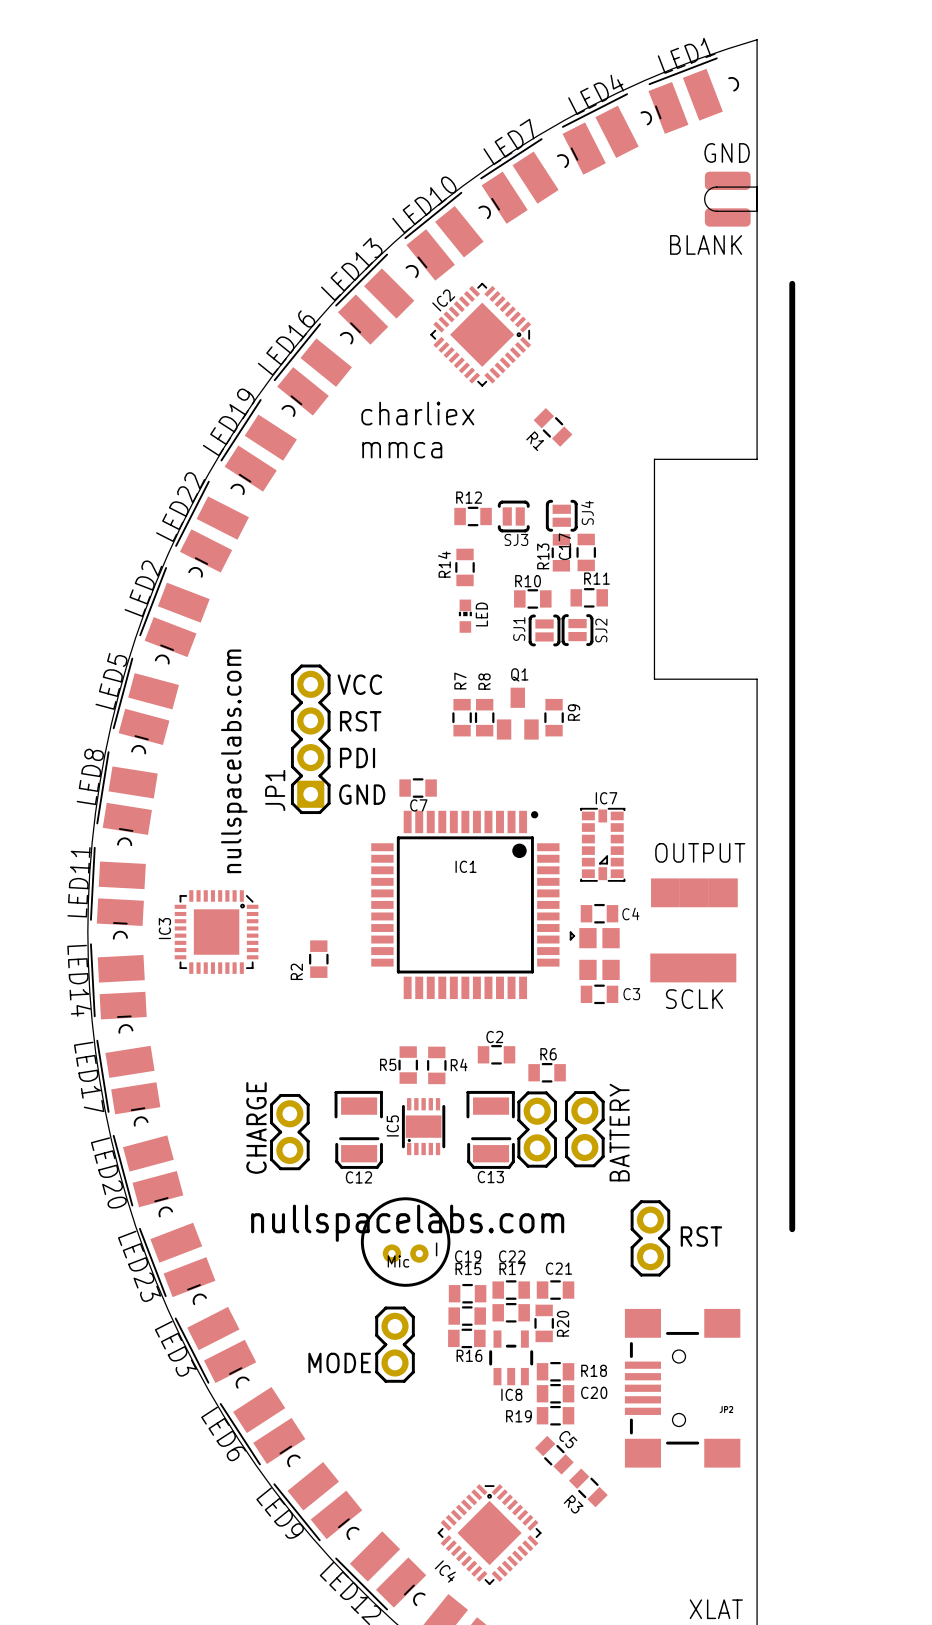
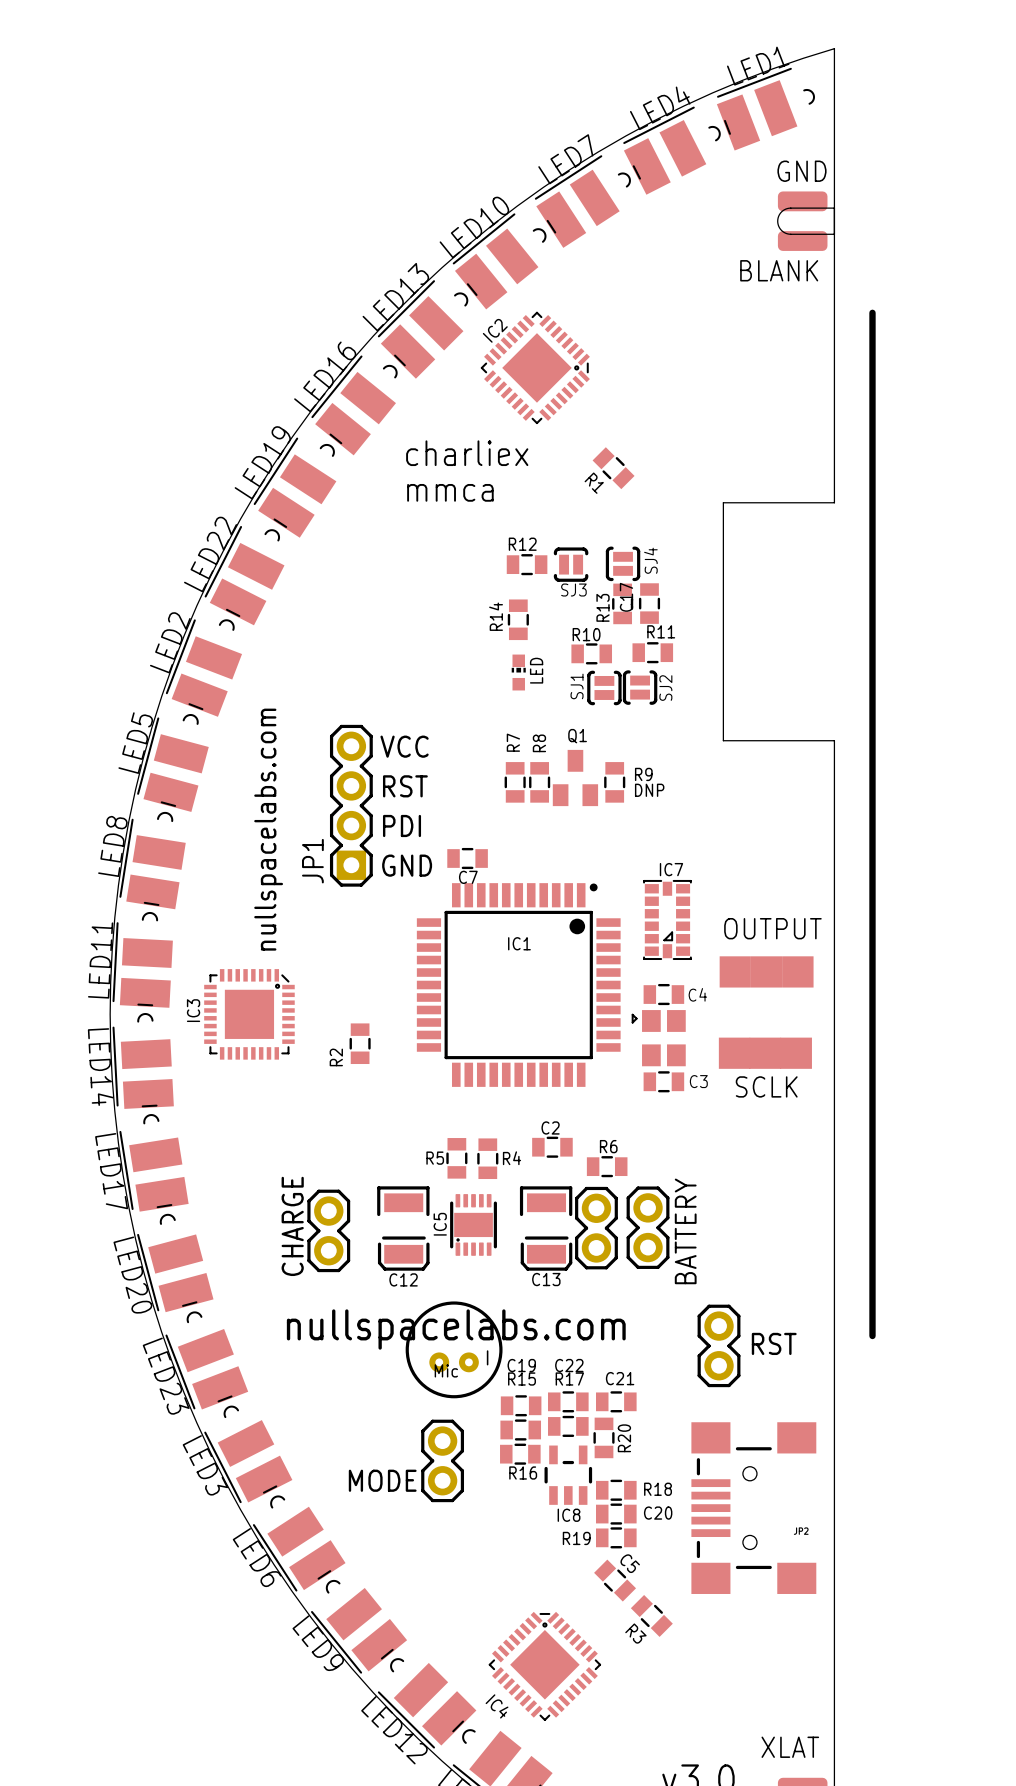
R9 name rotation: 0° (574, 712) -> 90° clockwise (643, 774)
text: none -> DNP (649, 790)

